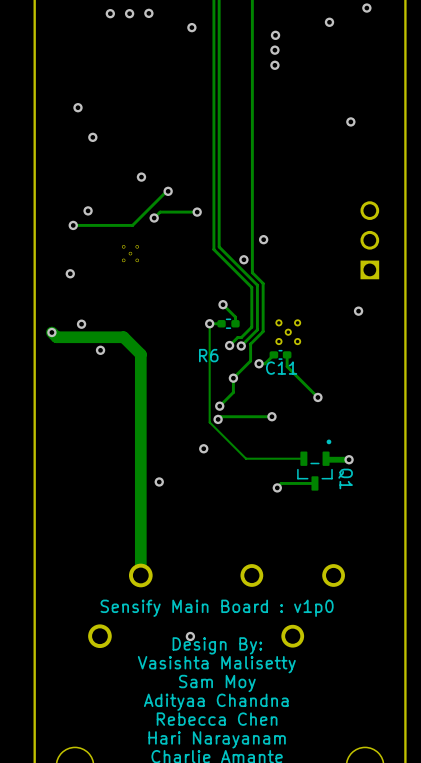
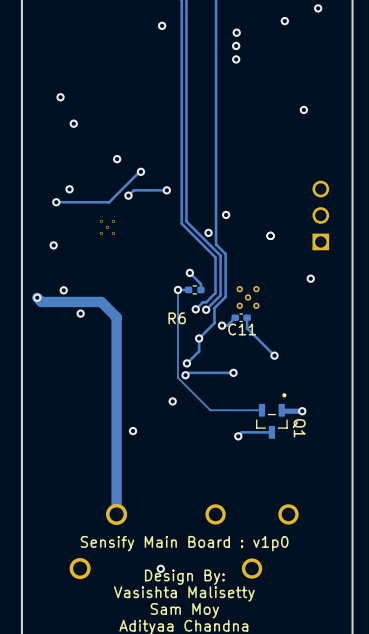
via: (110, 13) -> none
via: (129, 13) -> none
via: (148, 13) -> none
via: none -> (270, 235)

